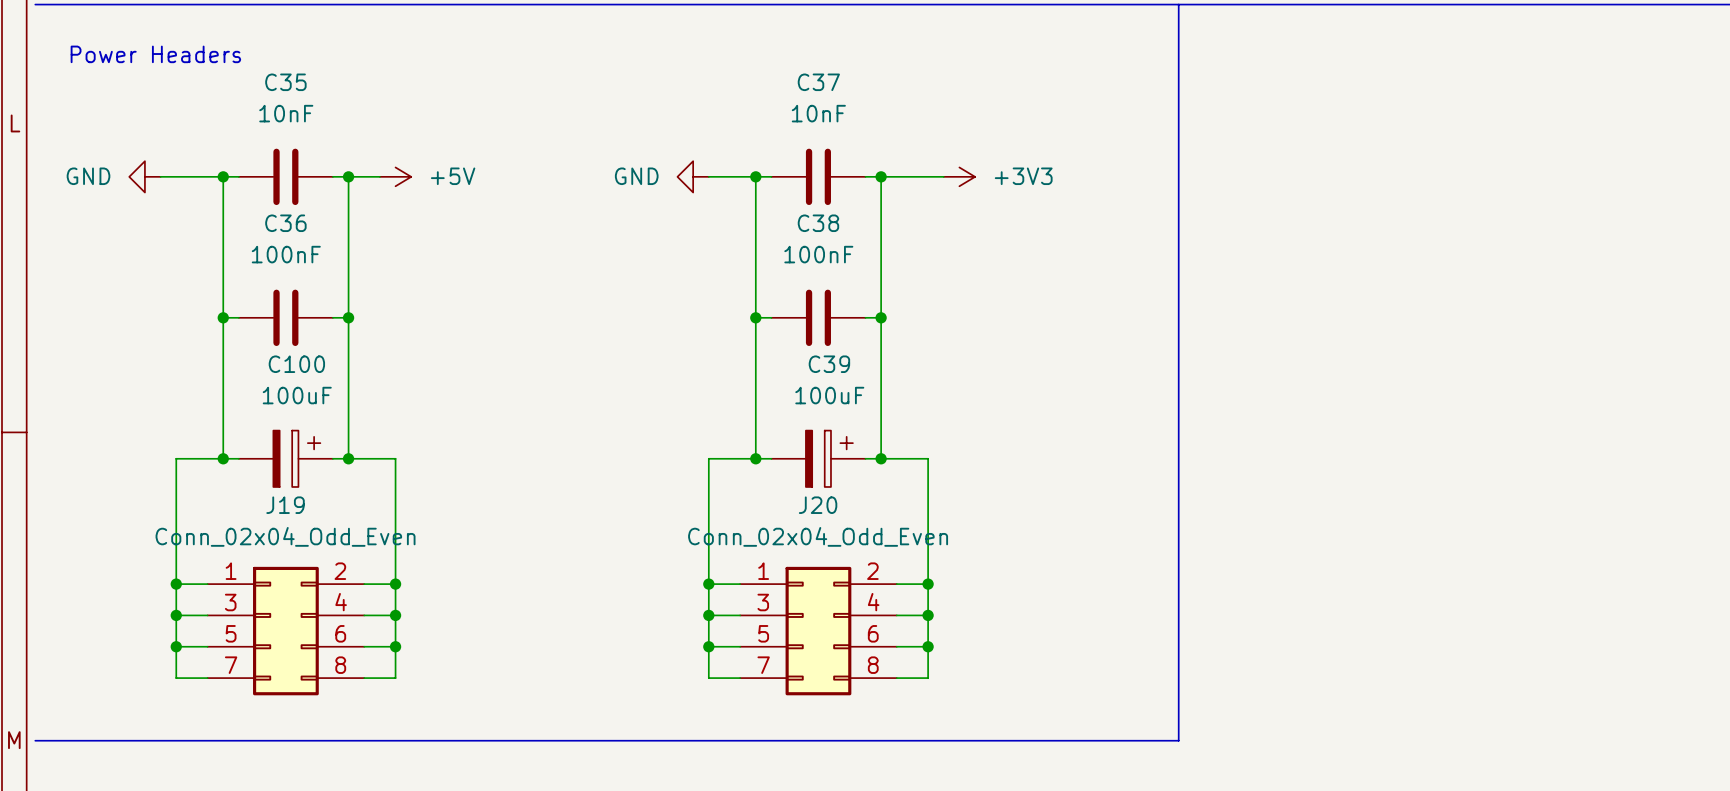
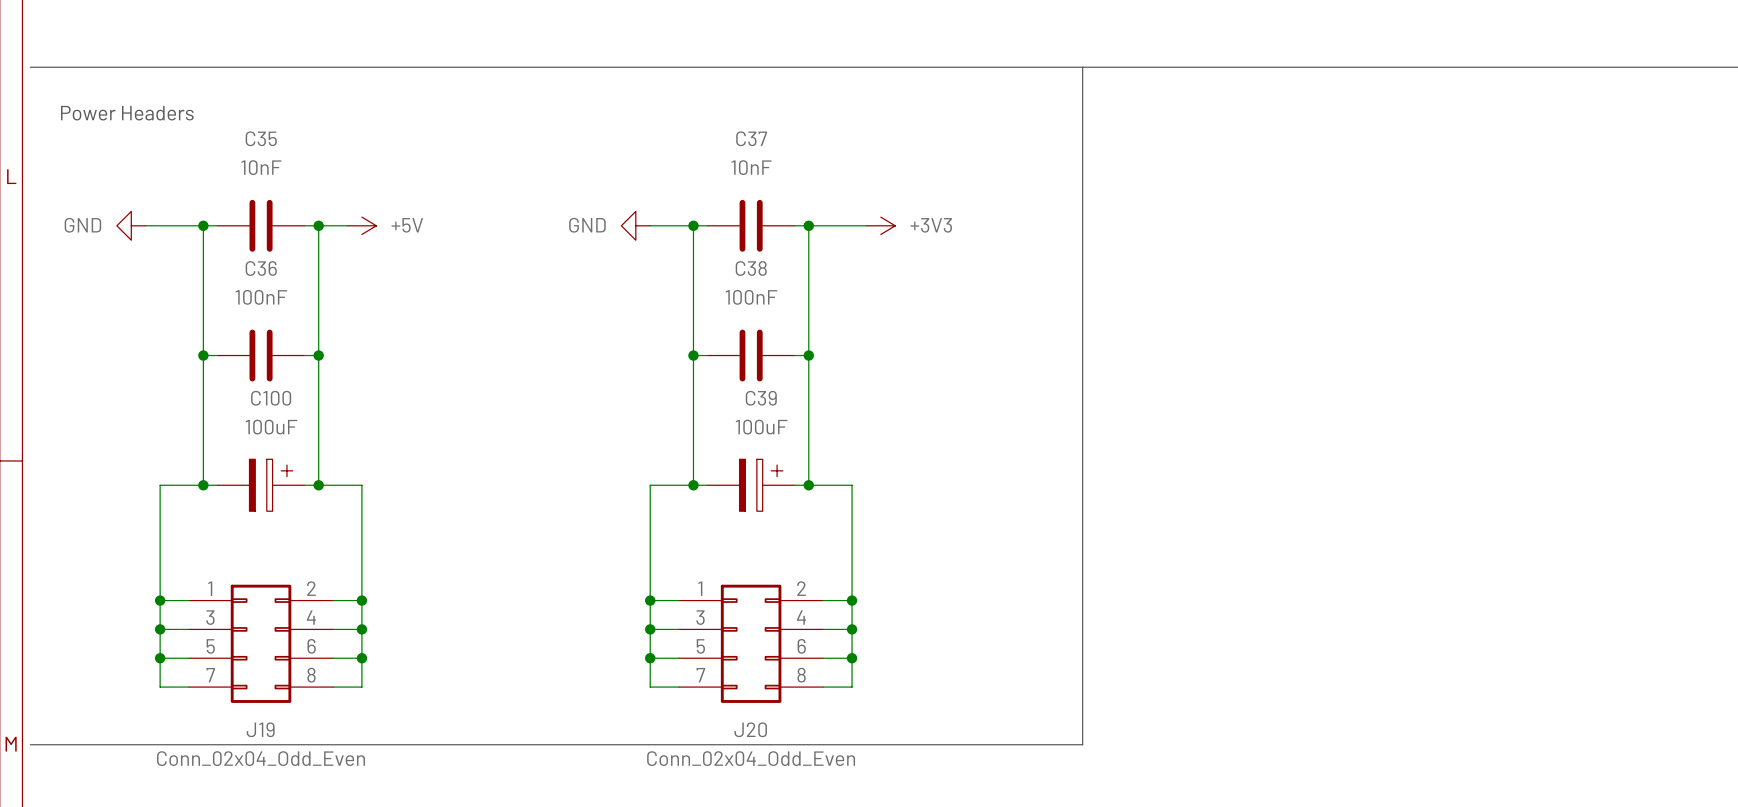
J19 name position: J19 (285, 505) -> J19 (260, 729)
J20 name position: J20 (818, 505) -> J20 (750, 729)
J19 value position: Conn_02x04_Odd_Even (285, 536) -> Conn_02x04_Odd_Even (261, 758)
J20 value position: Conn_02x04_Odd_Even (818, 536) -> Conn_02x04_Odd_Even (751, 758)

